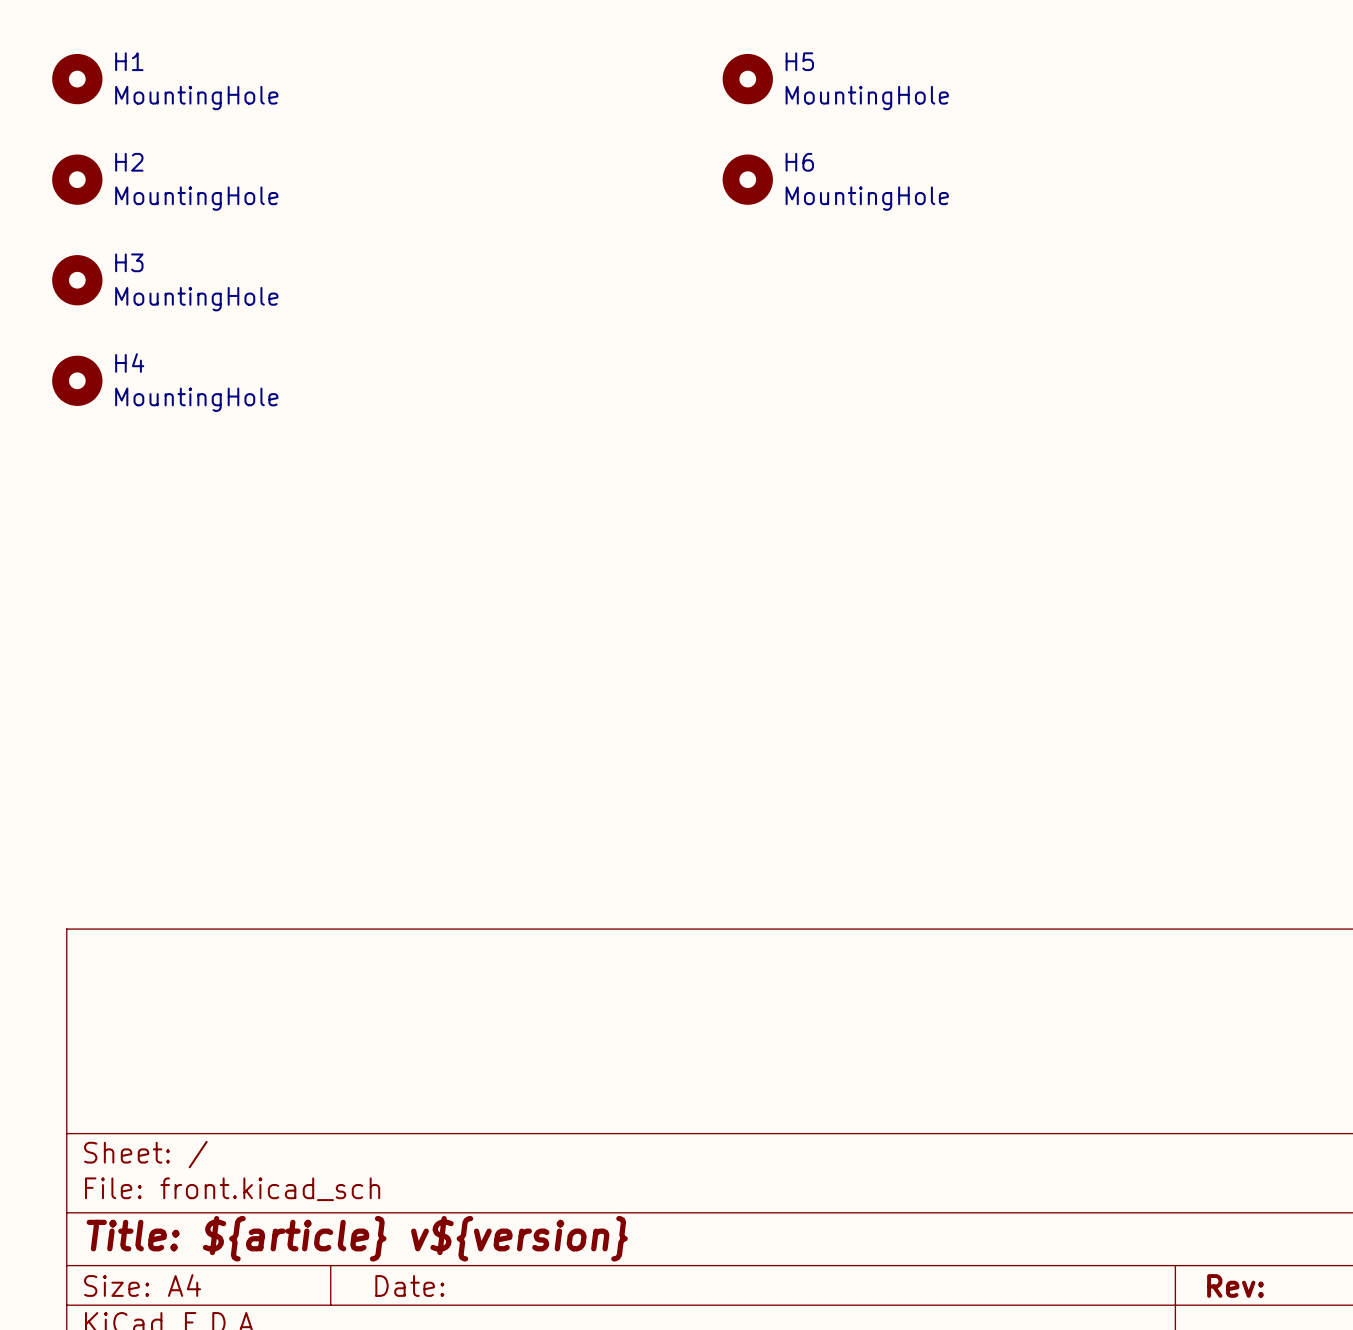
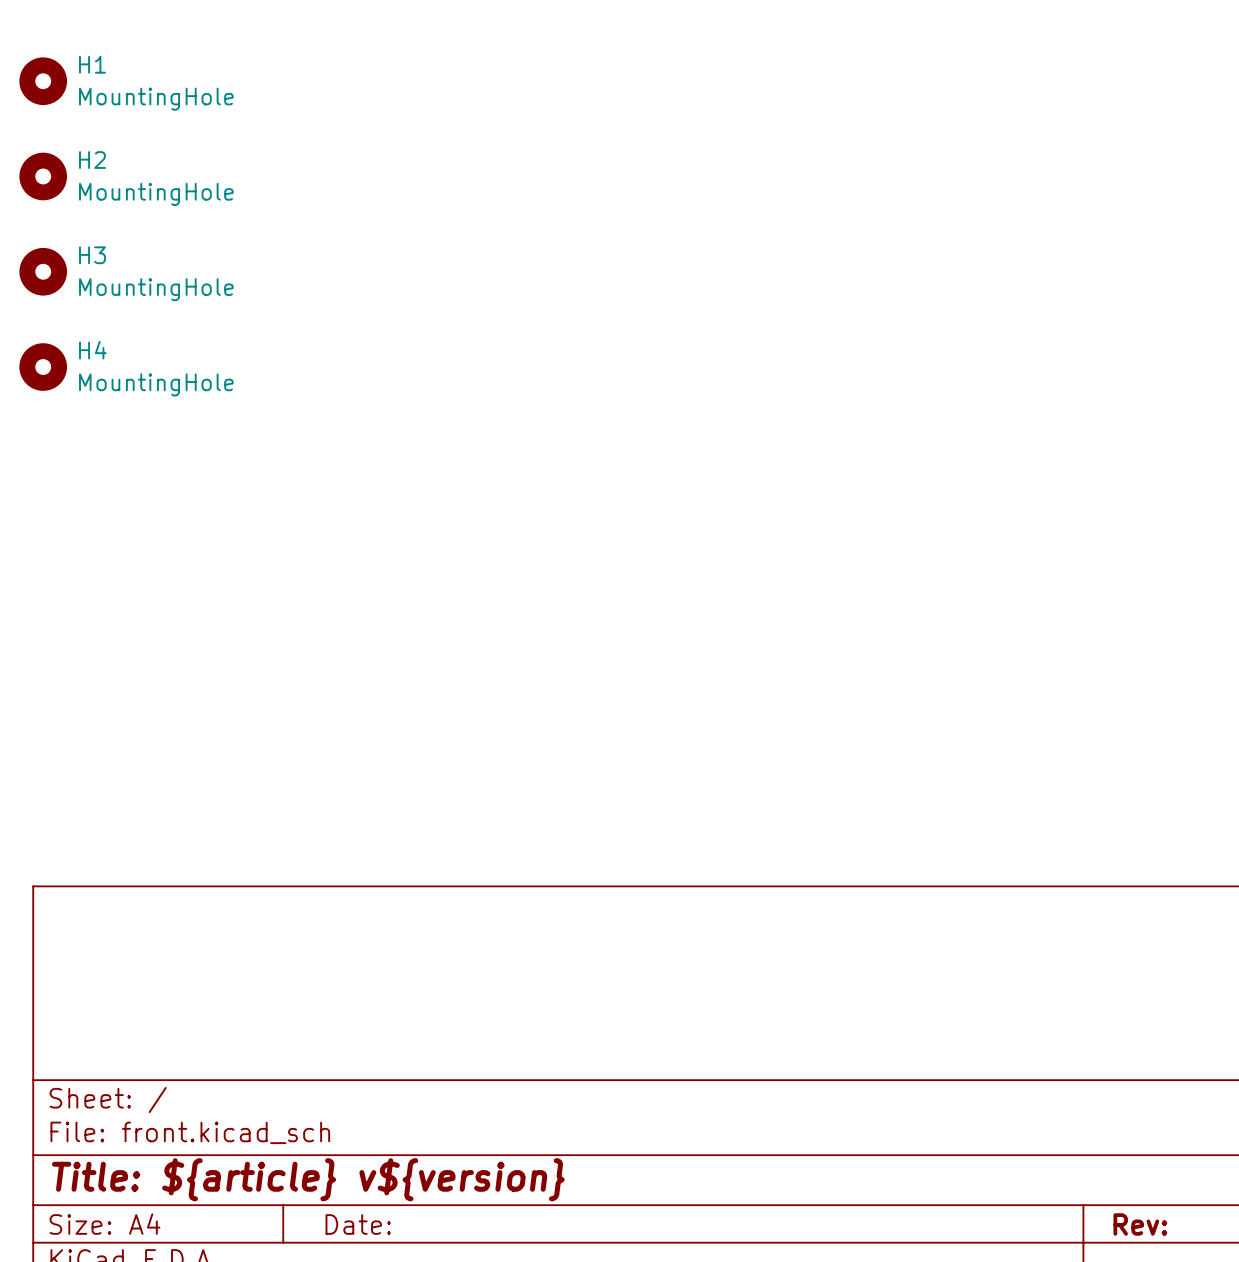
H5: MountingHole (747, 79) -> none
H6: MountingHole (747, 179) -> none

